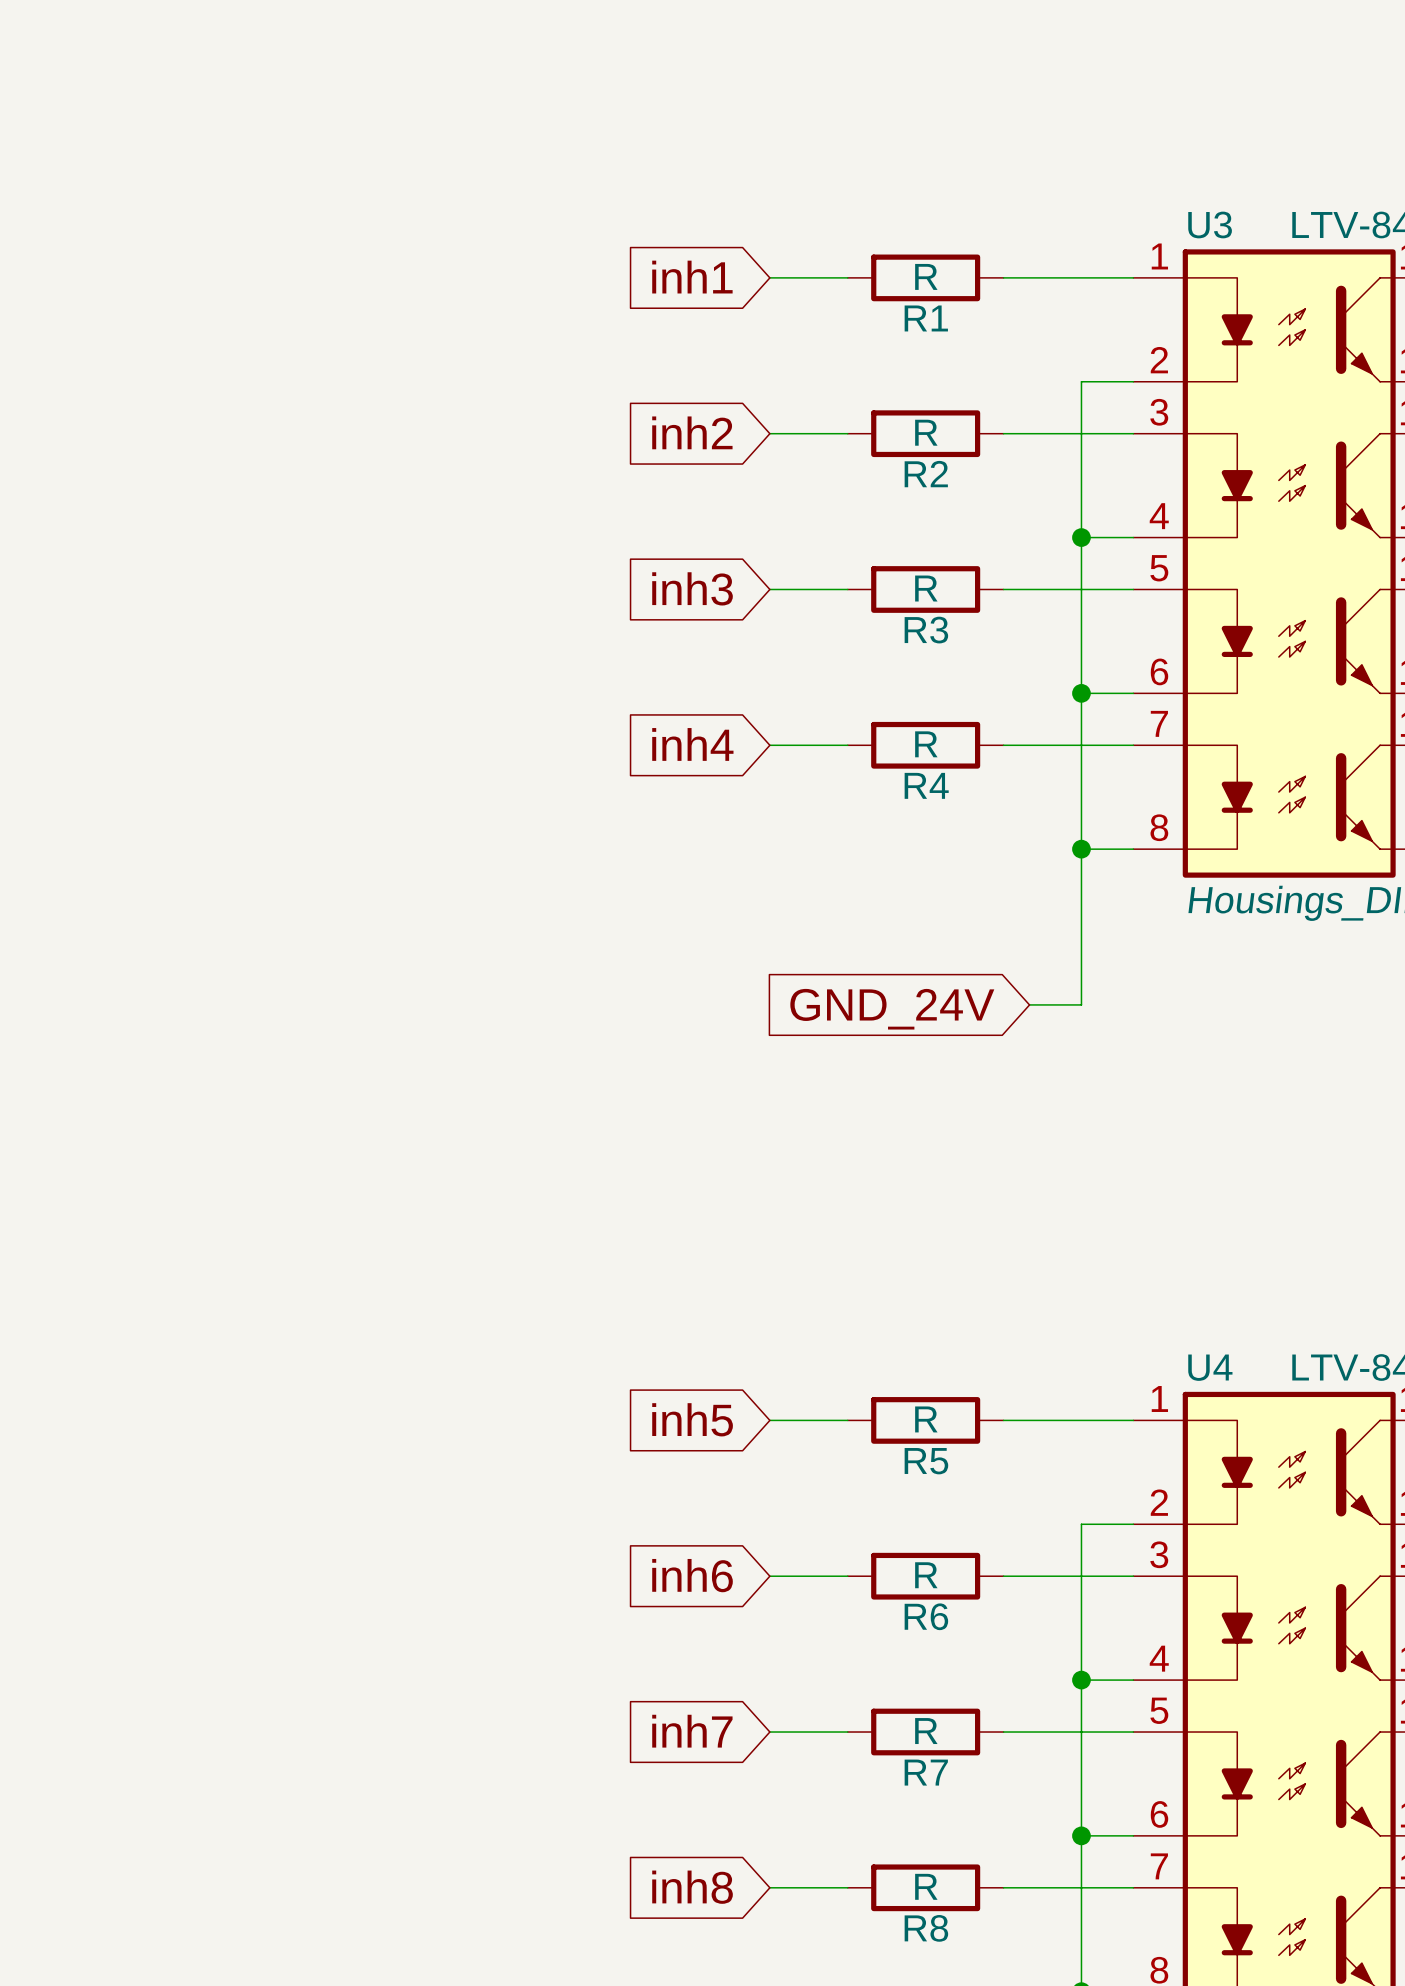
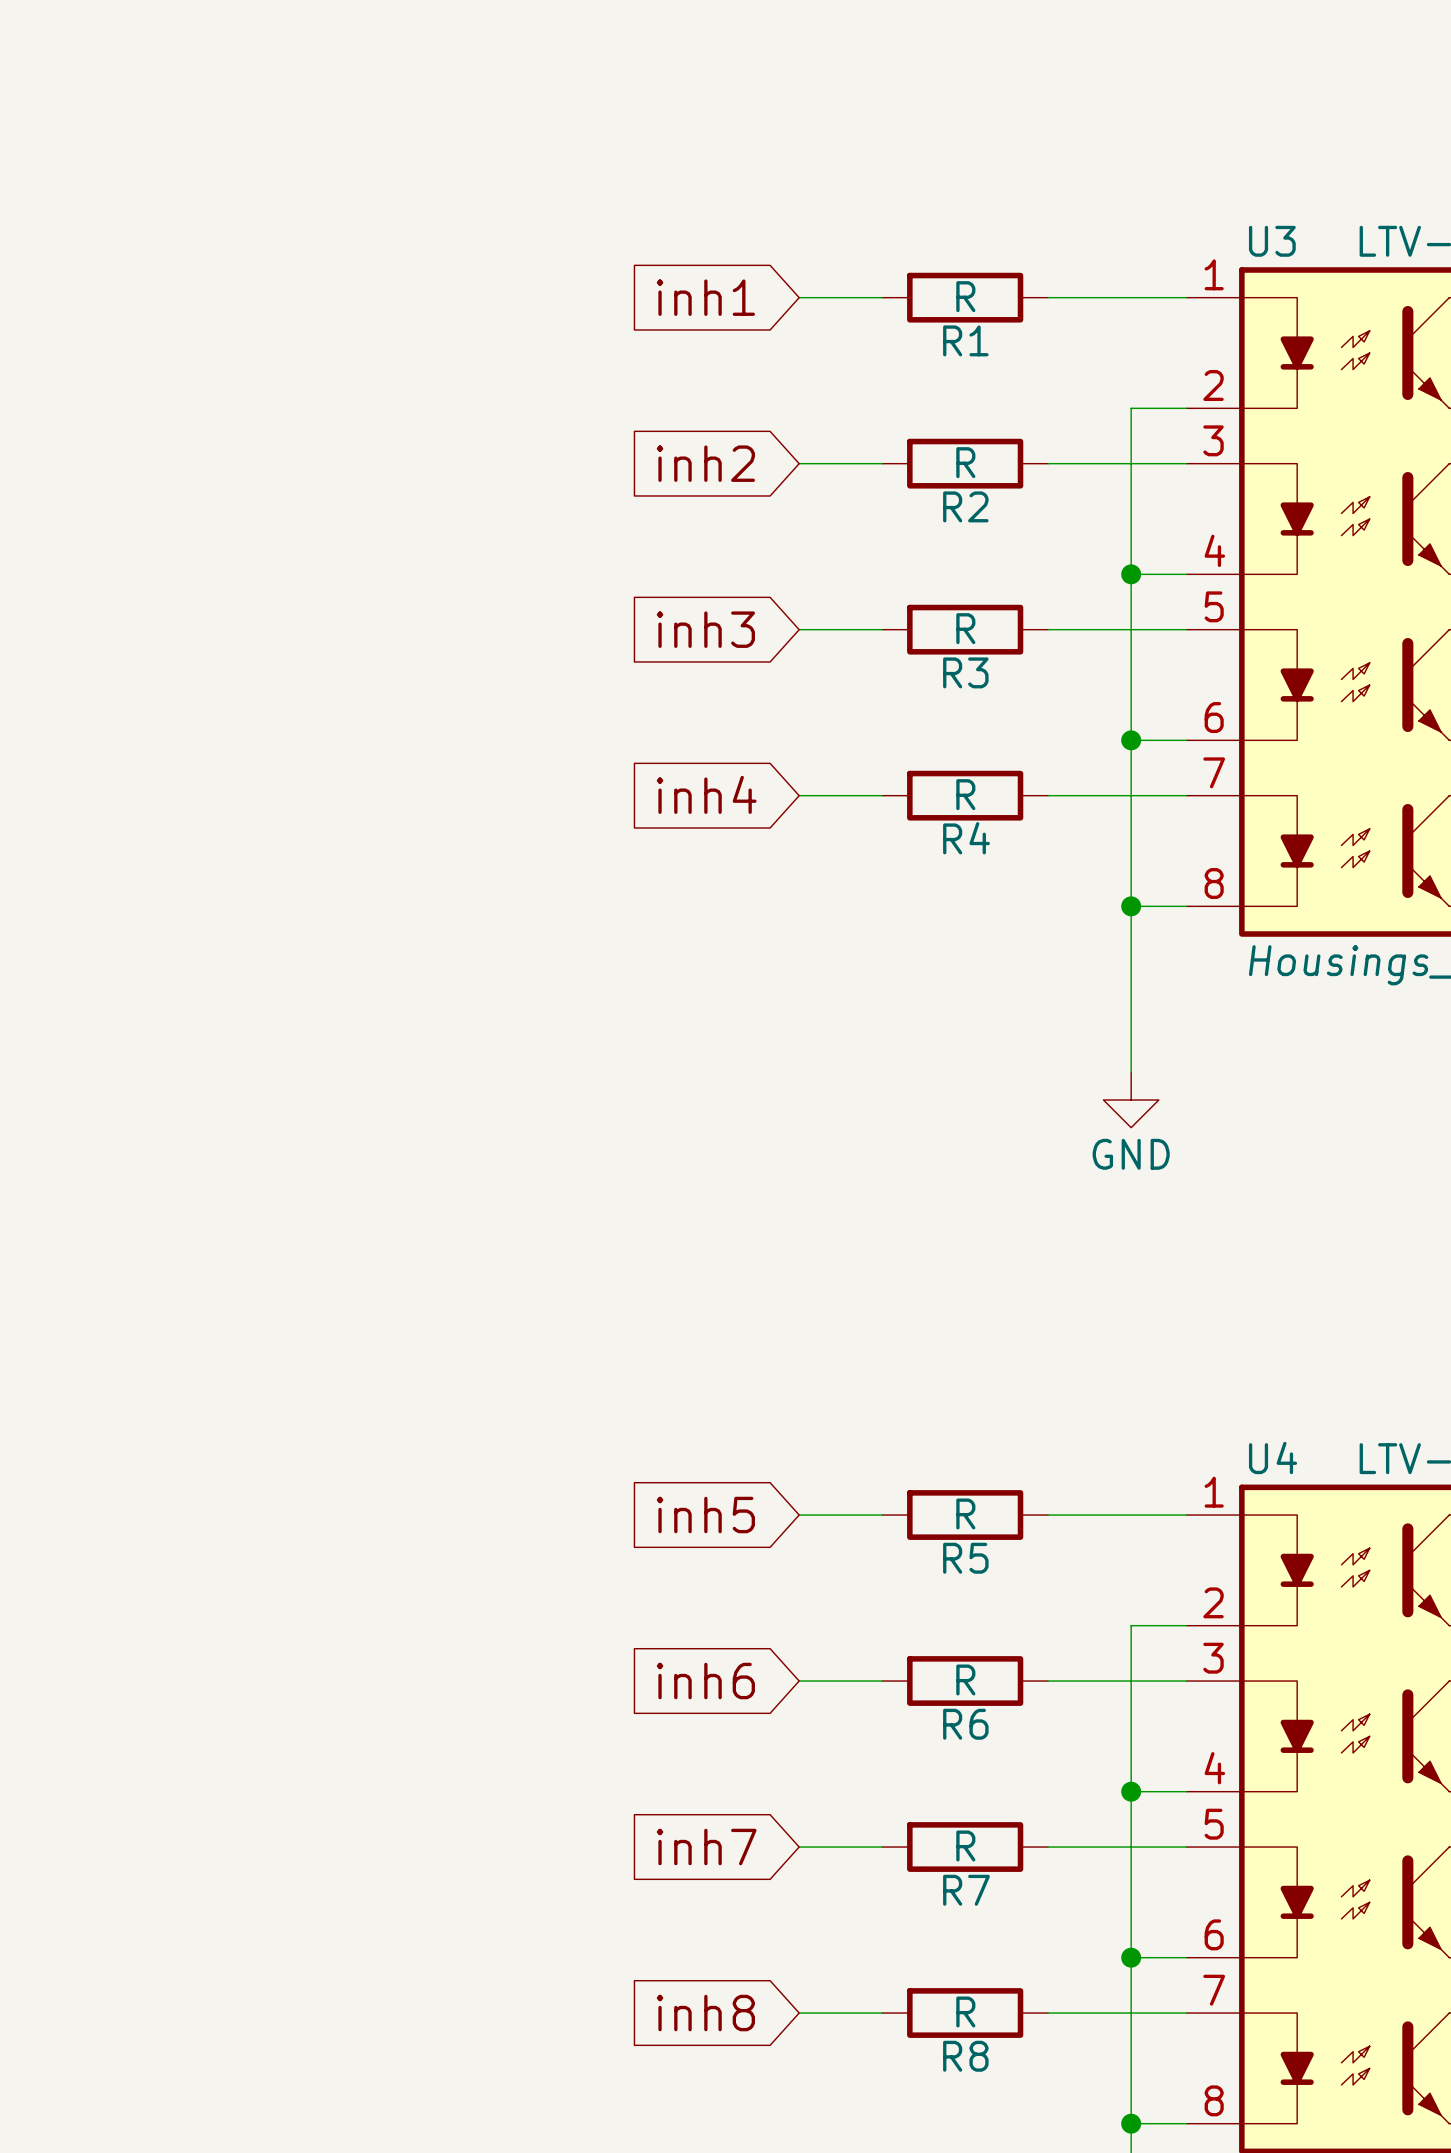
wire: (1029, 1004) (1081, 1004) -> none
global label: GND_24V (892, 1009) -> none
power symbol: none -> GND (1131, 1100)

